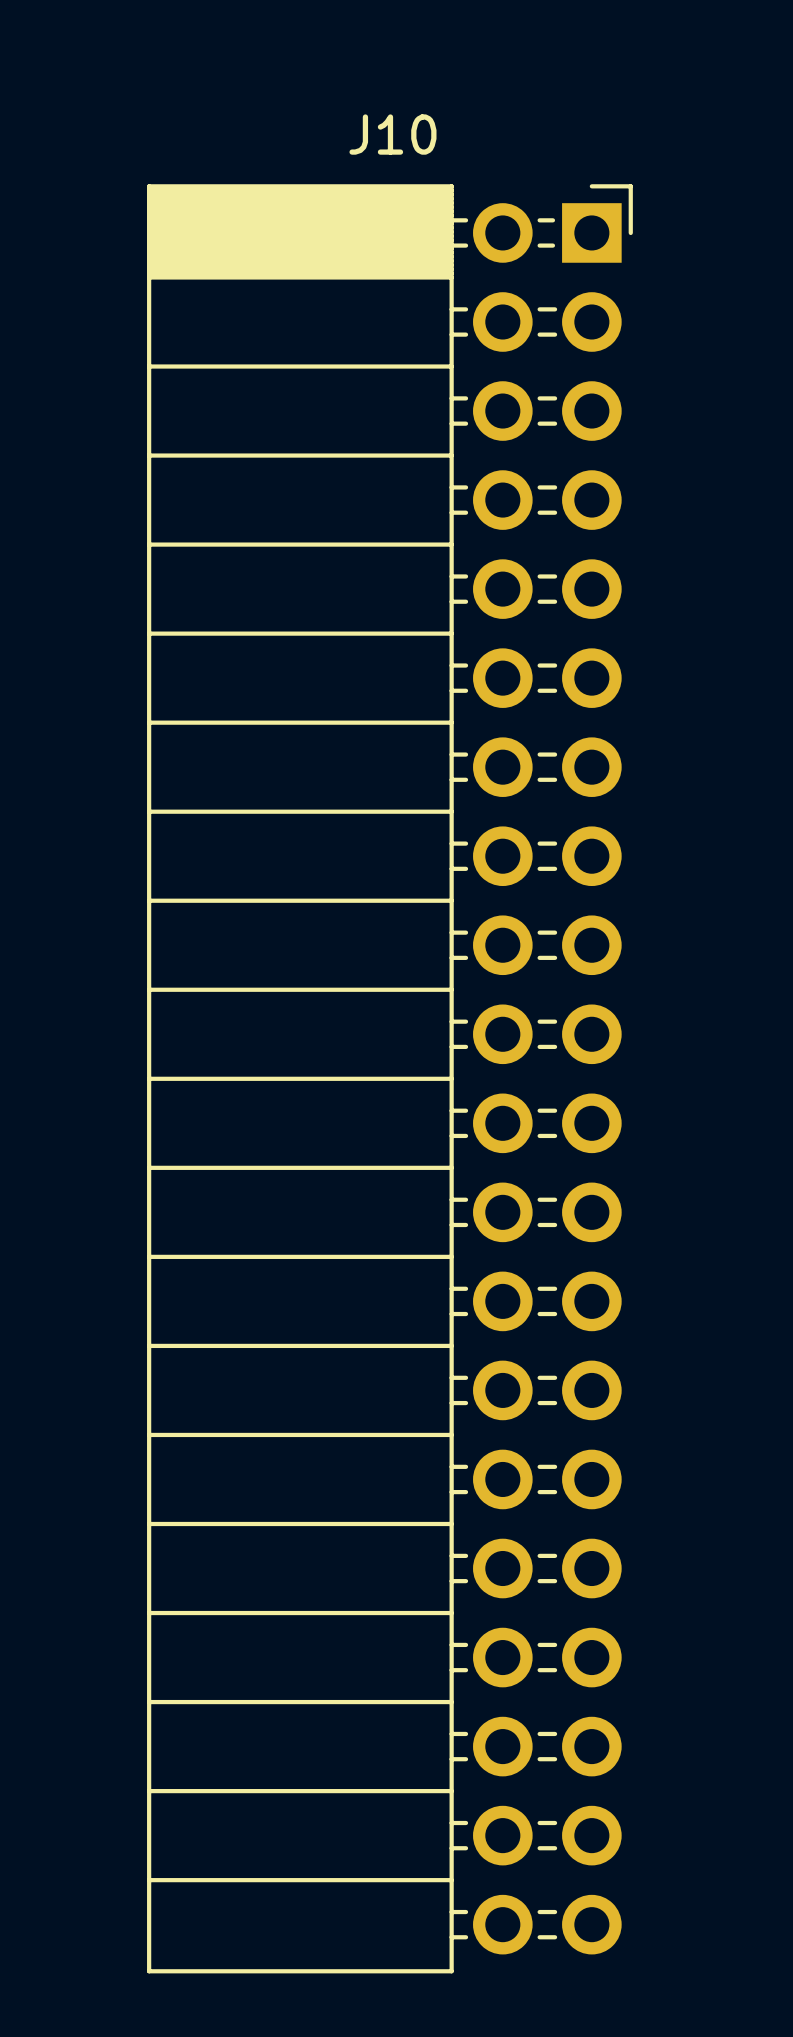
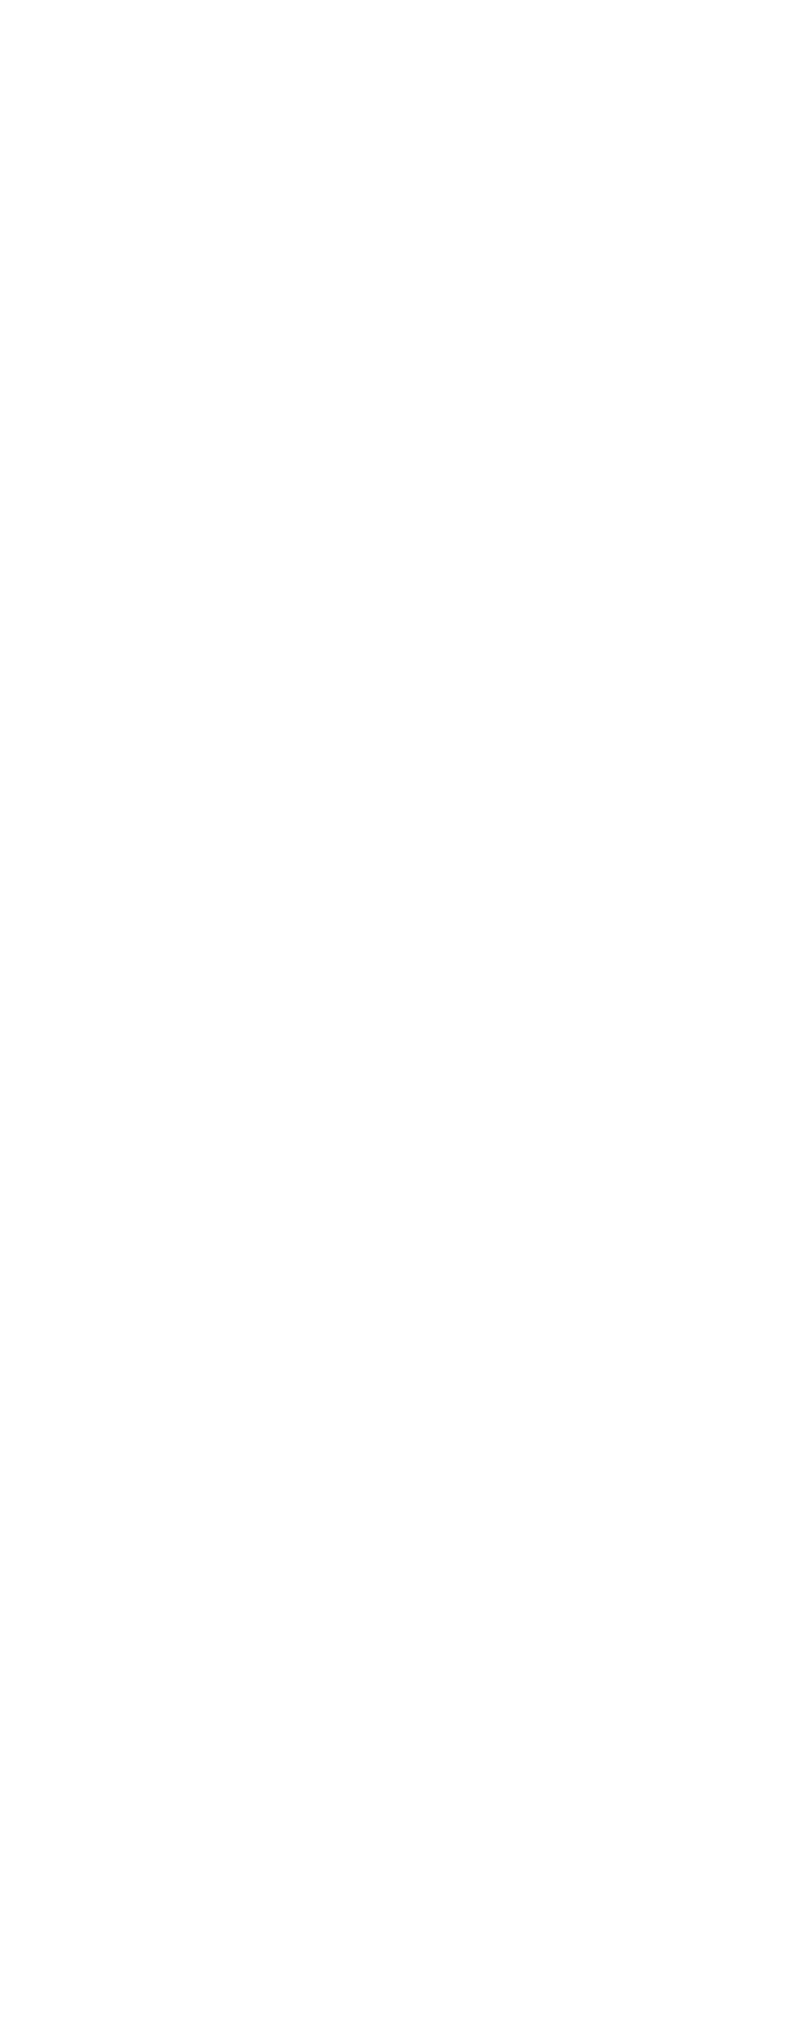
J10: (389, 1078) -> none

